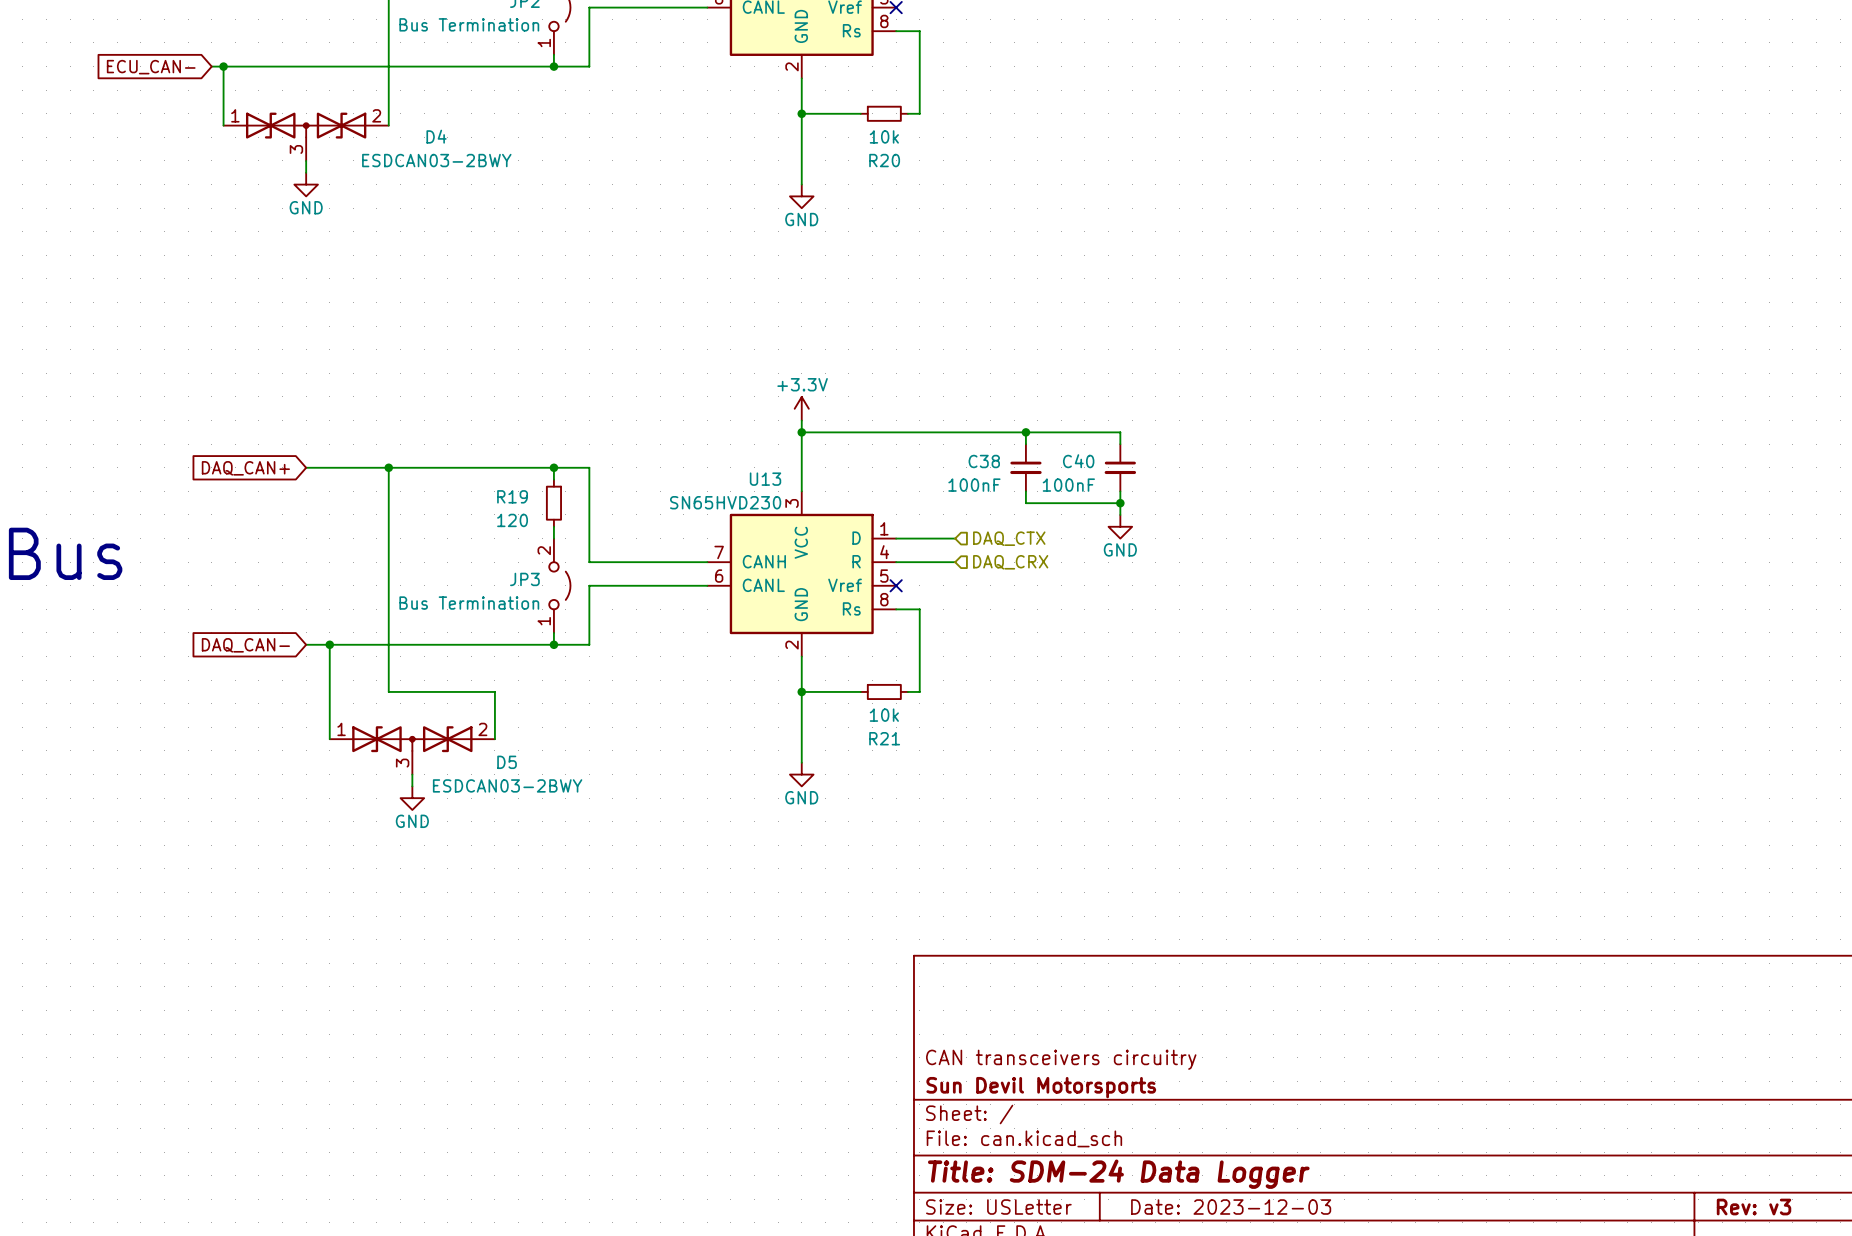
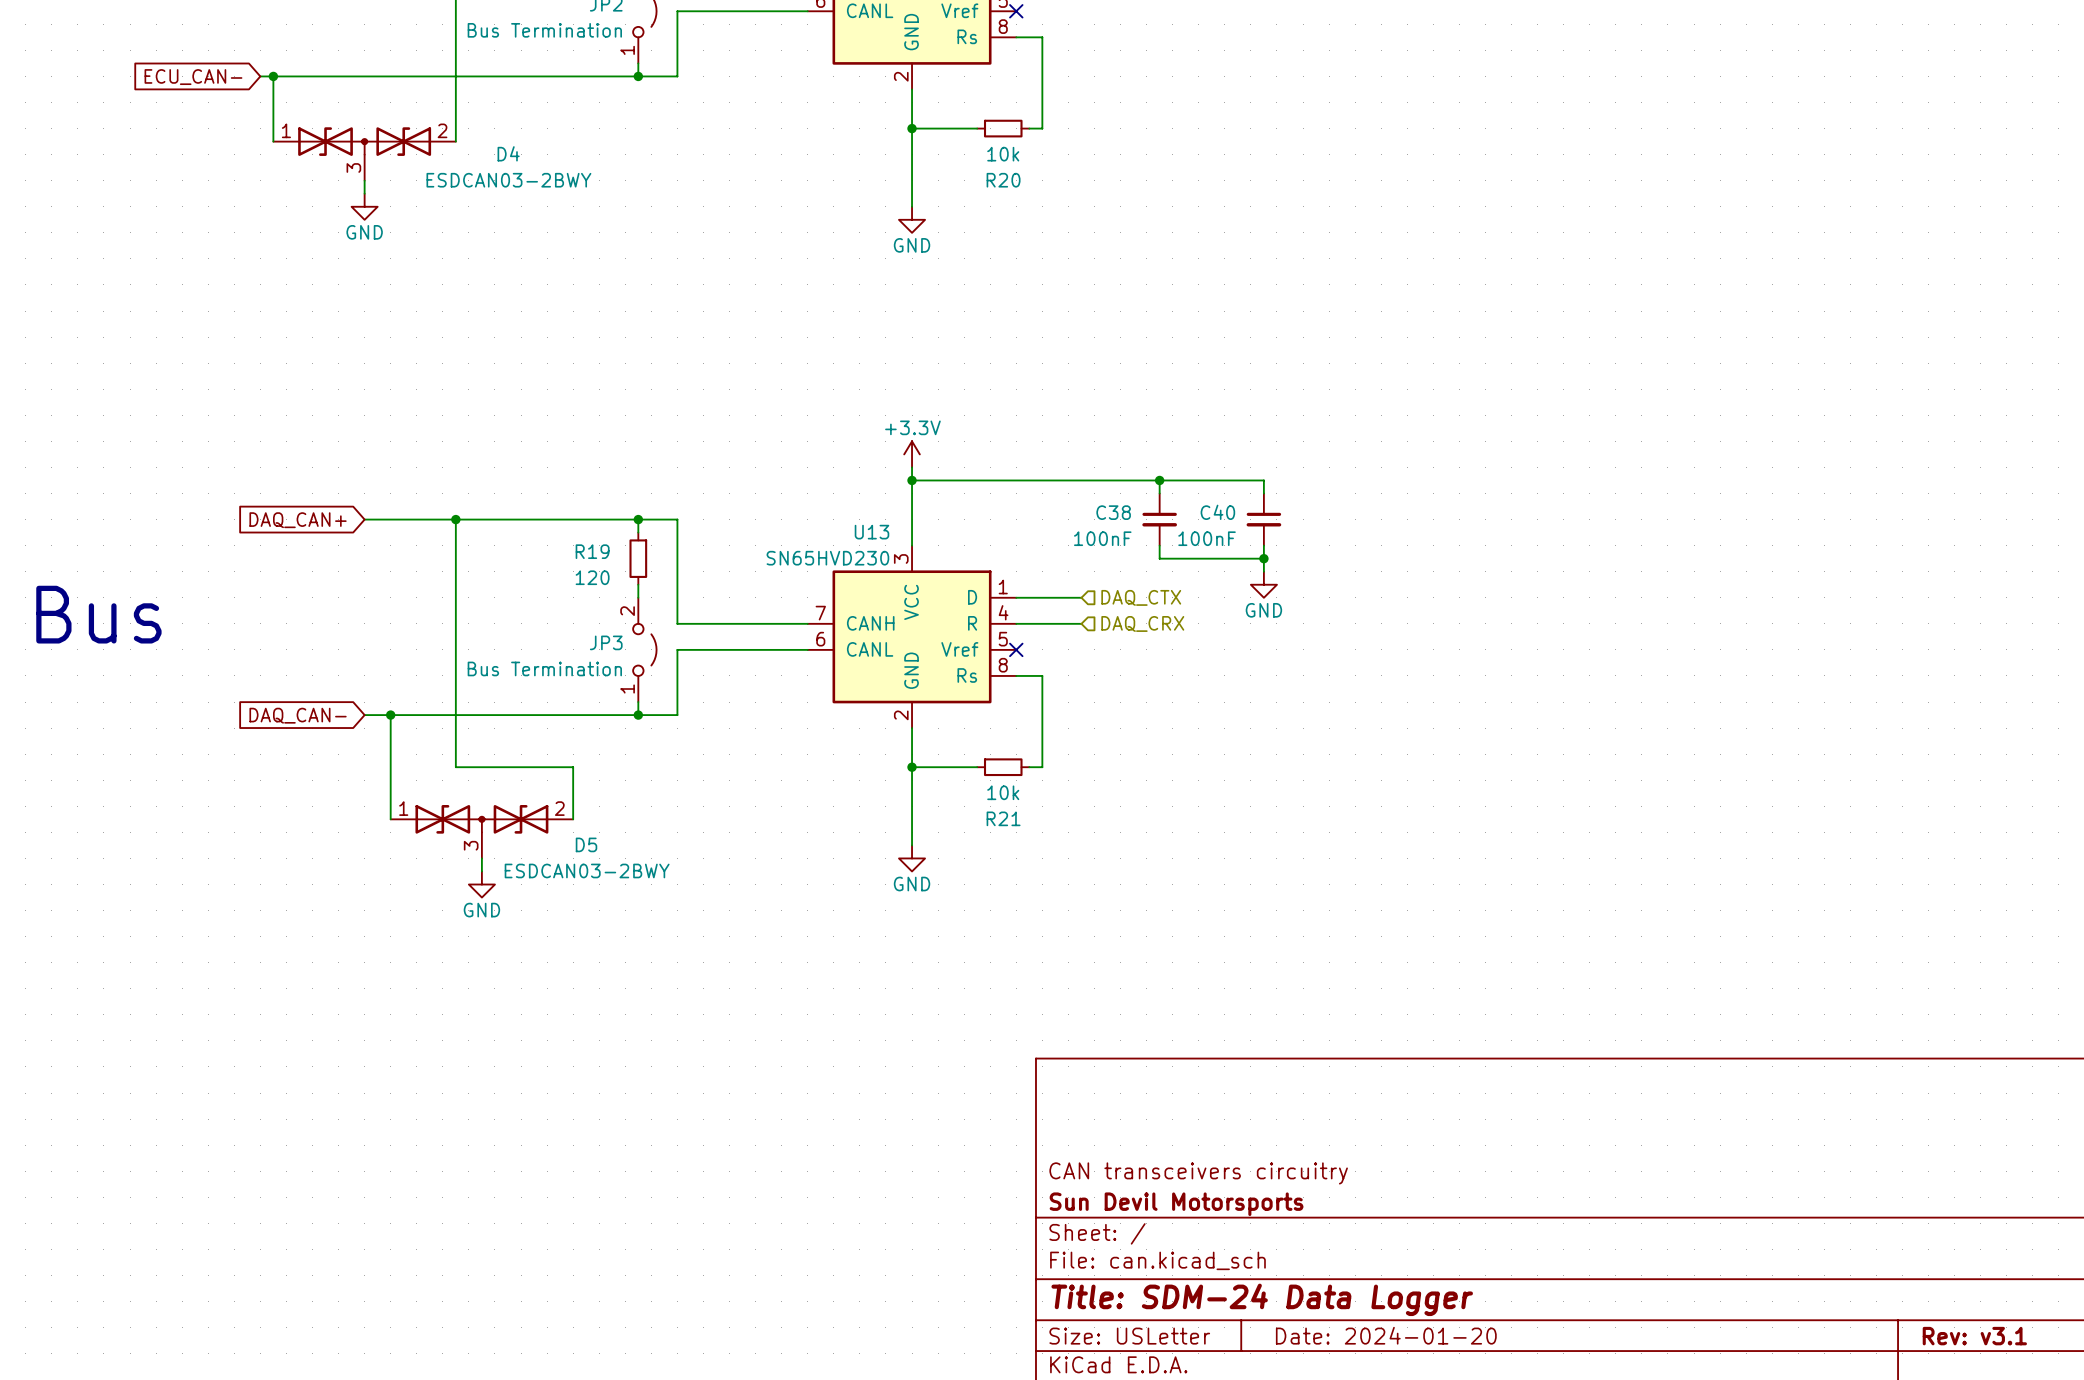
title block: Date: 2023-12-03 (1231, 1207) -> Date: 2024-01-20 (1386, 1335)
title block: Rev: v3 (1754, 1207) -> Rev: v3.1 (1974, 1336)

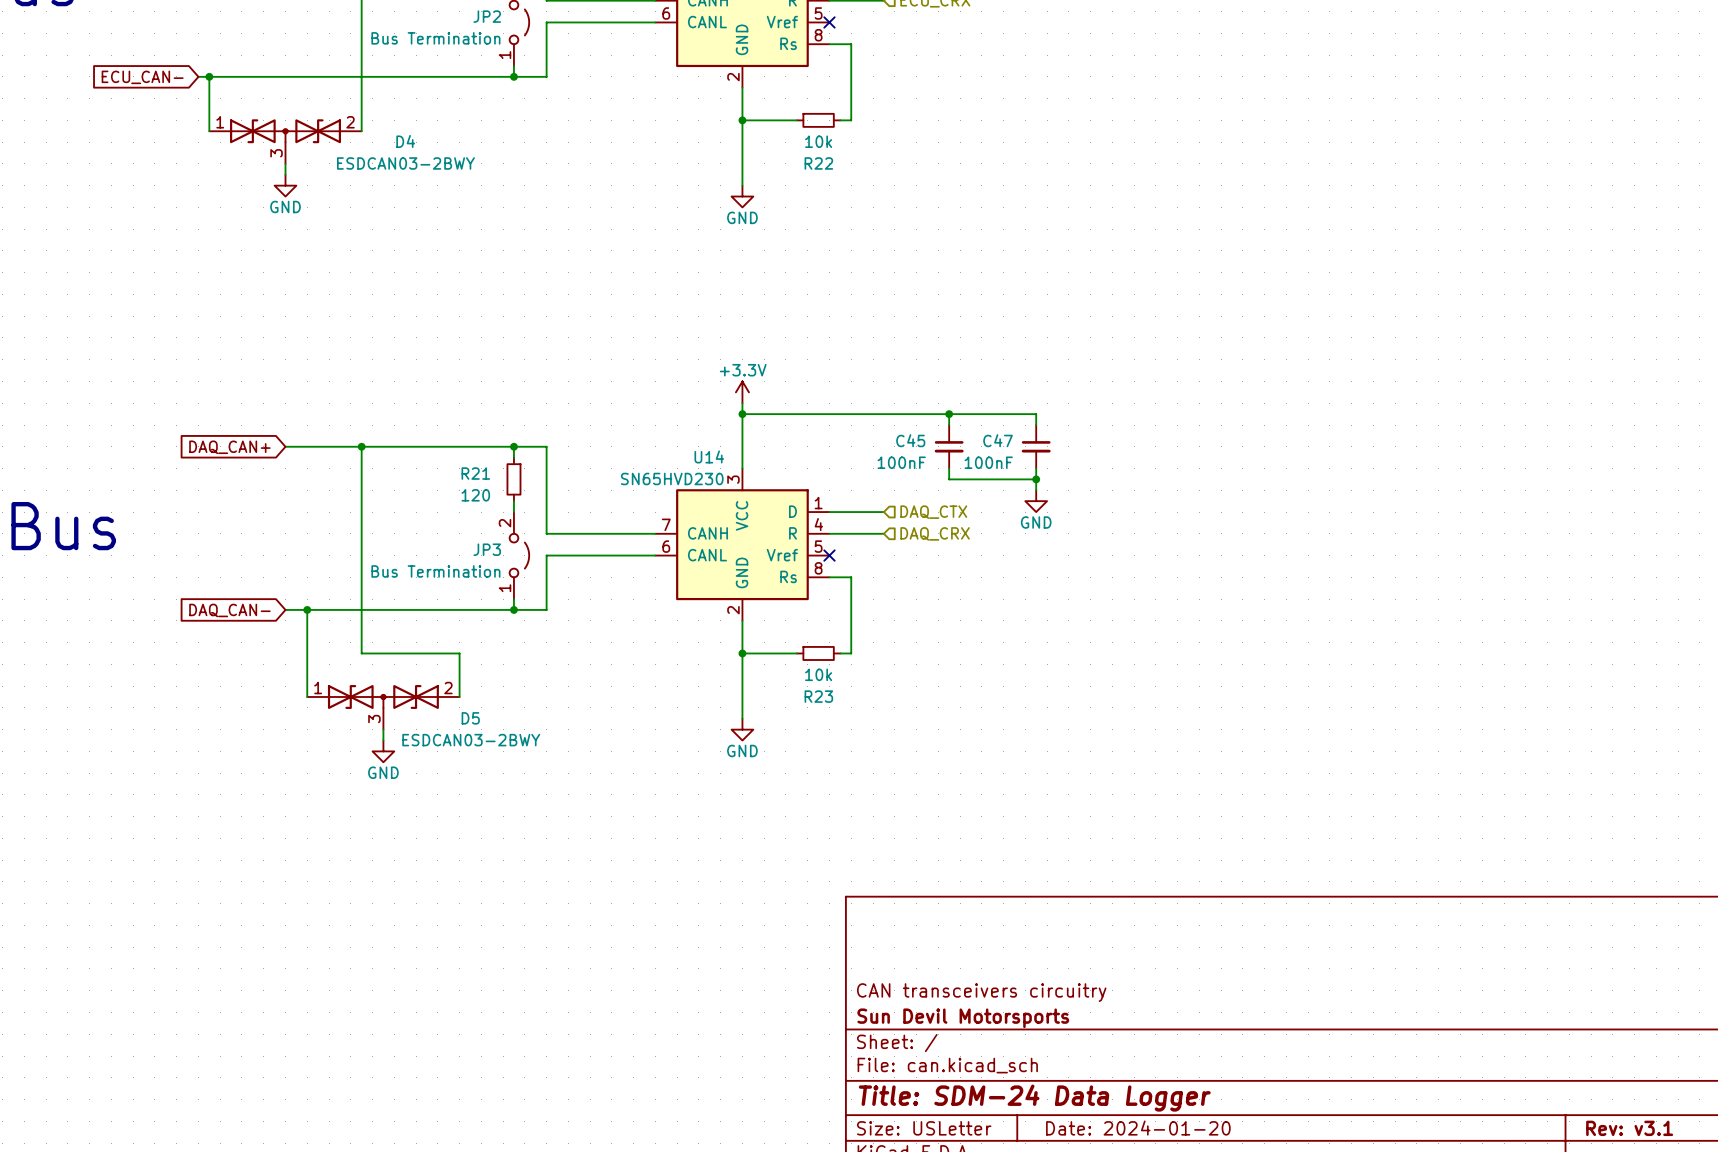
R20 name: R20 (1003, 180) -> R22 (818, 163)
C38 name: C38 (1113, 512) -> C45 (910, 440)
C40 name: C40 (1217, 512) -> C47 (998, 440)
U13 name: U13 (871, 532) -> U14 (709, 456)
R19 name: R19 (592, 551) -> R21 (475, 473)
R21 name: R21 (1003, 818) -> R23 (818, 696)

